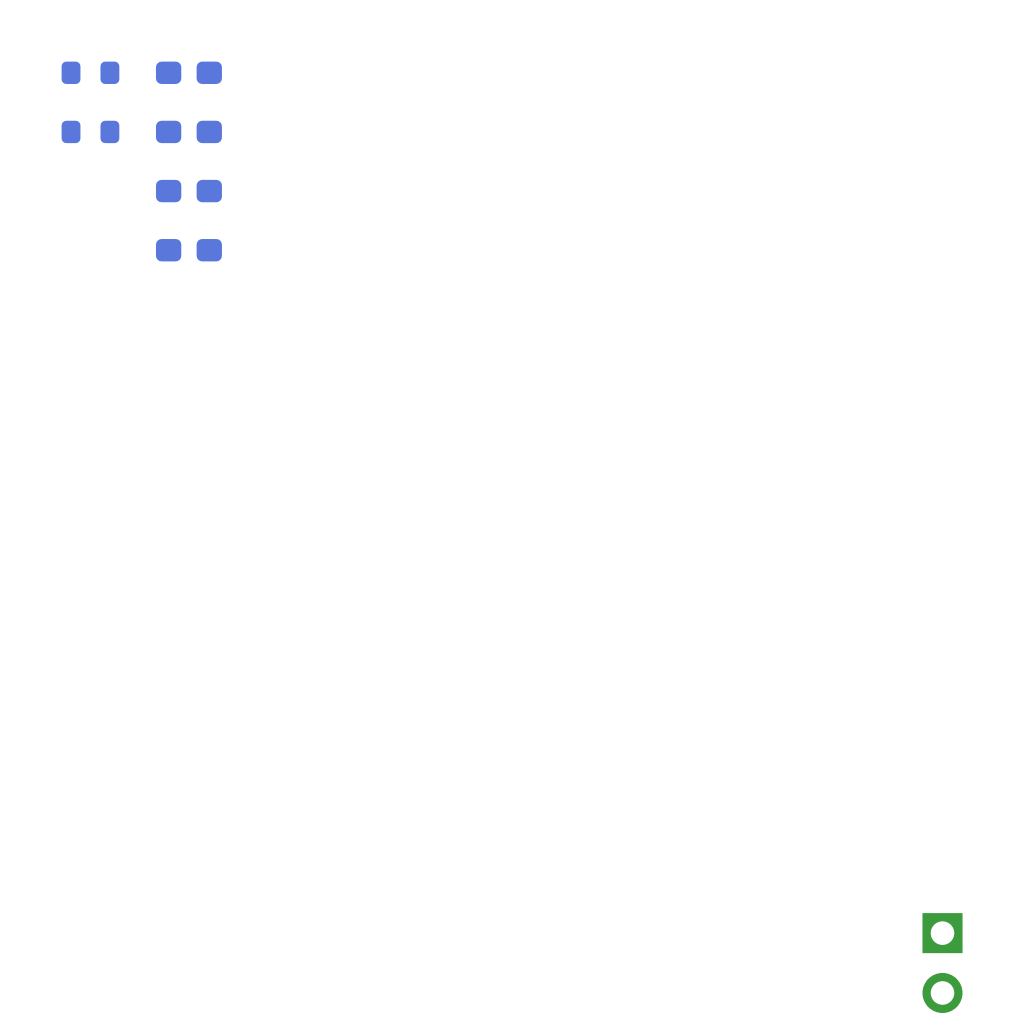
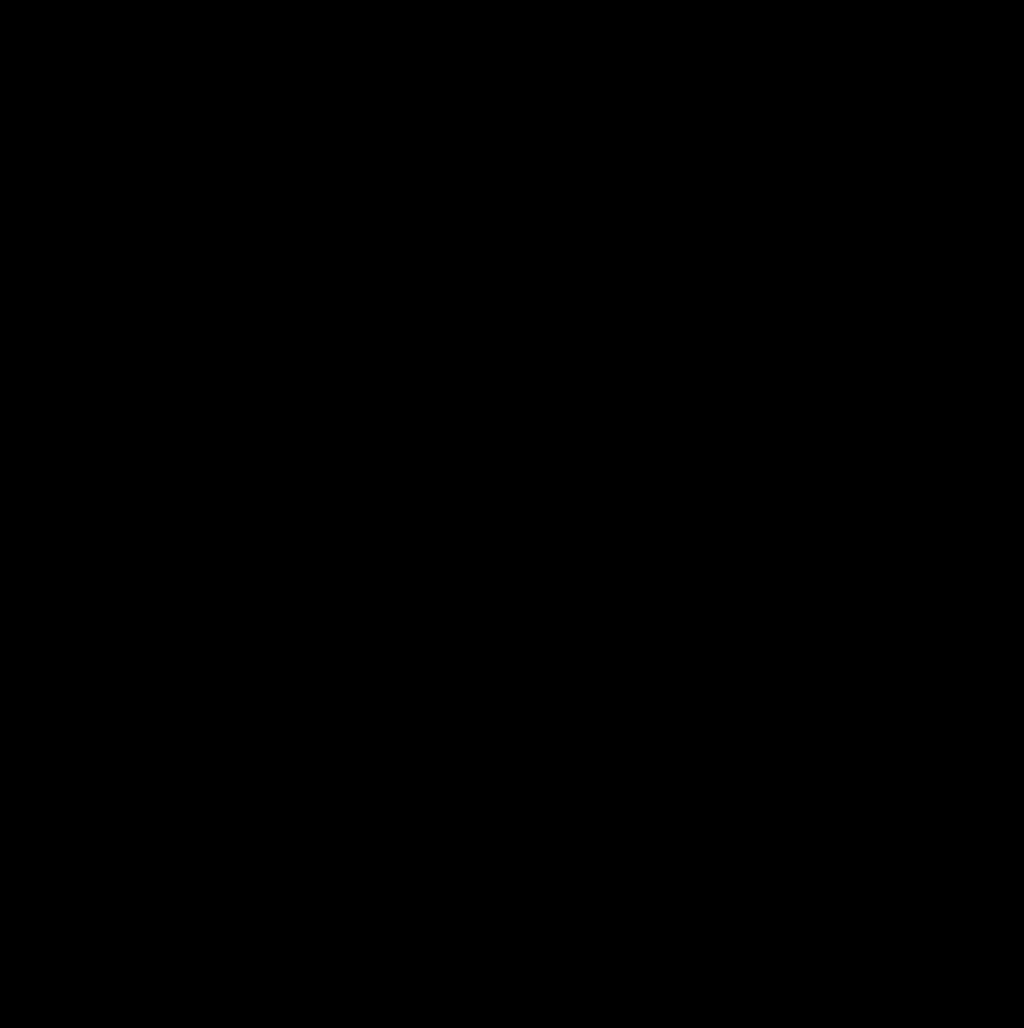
part: (90, 72) -> none
part: (188, 72) -> none
part: (90, 131) -> none
part: (188, 131) -> none
part: (188, 191) -> none
part: (188, 250) -> none
part: (942, 963) -> none

